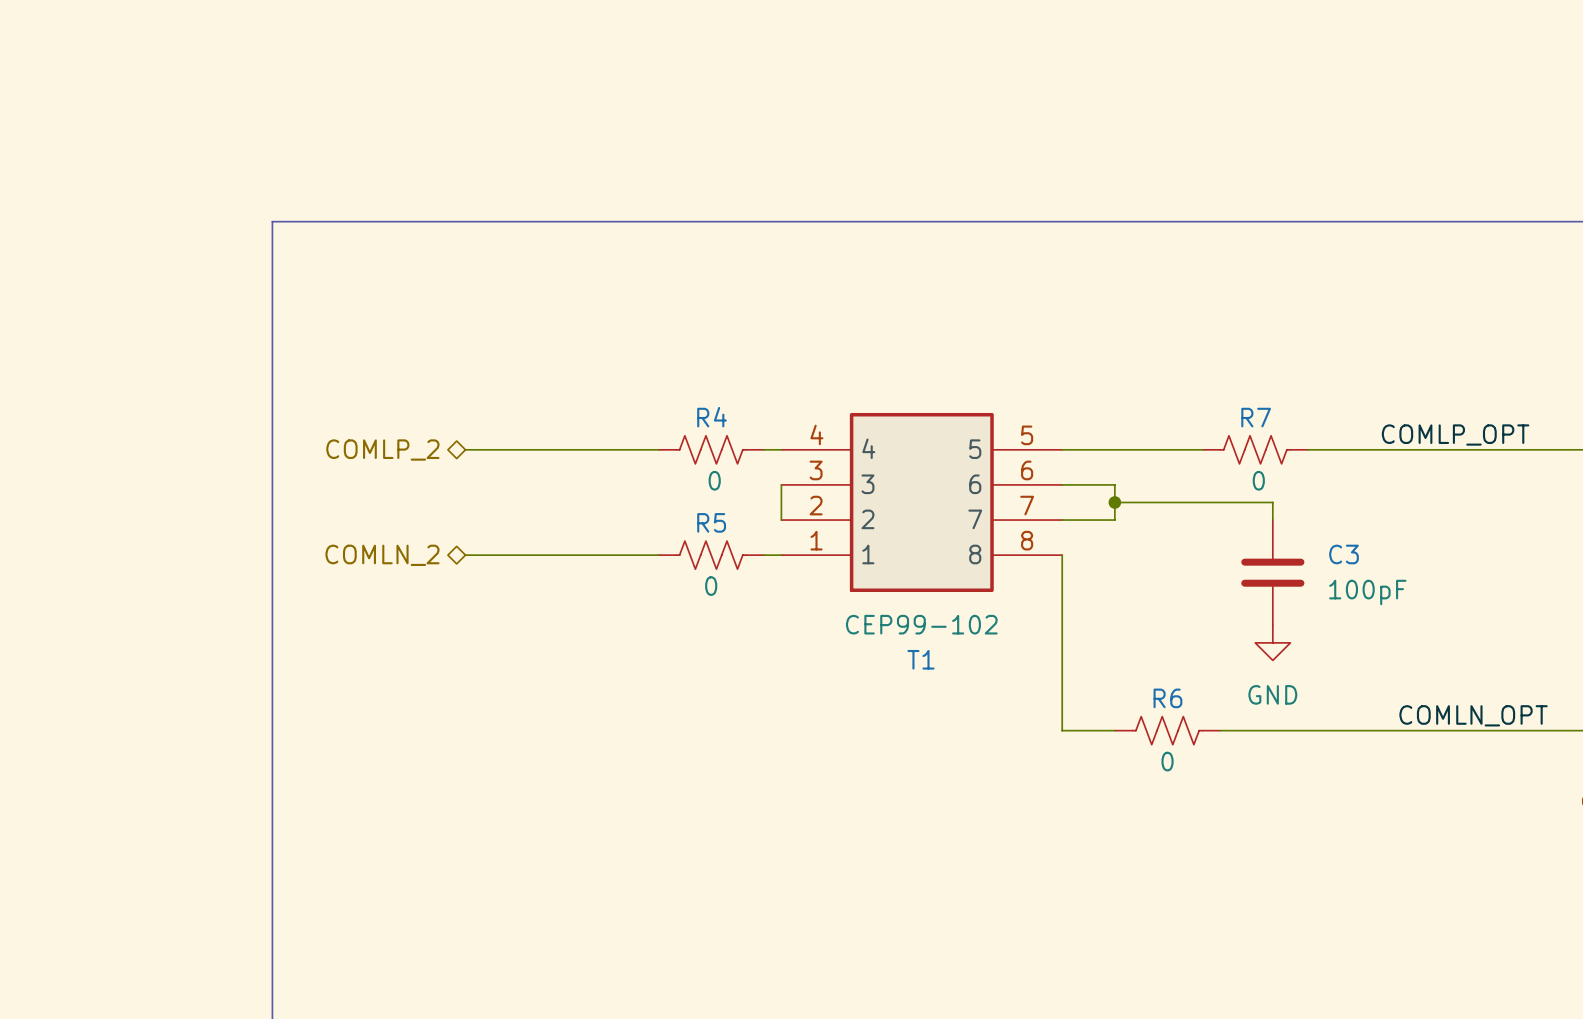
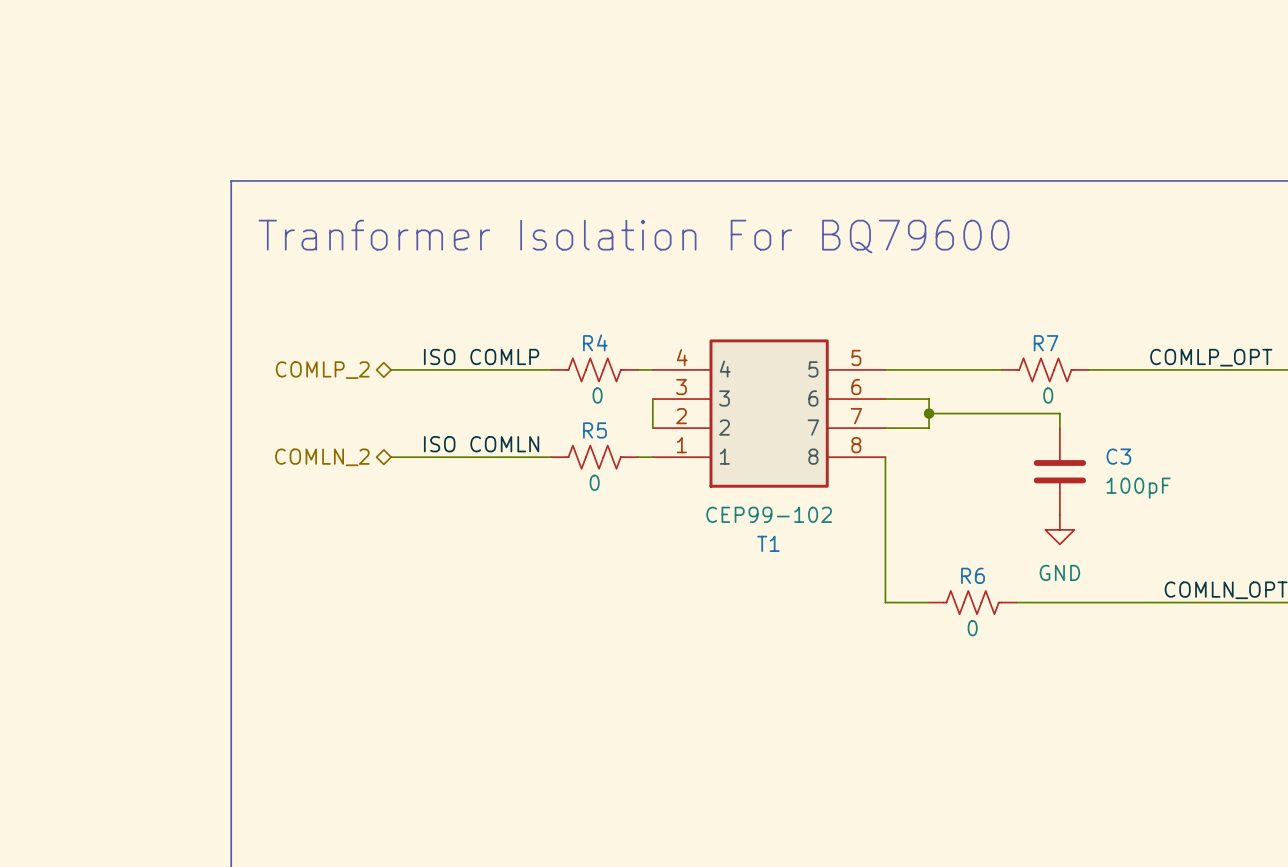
text: none -> Tranformer Isolation For BQ79600 (633, 236)
label: none -> ISO COMLP (481, 356)
label: none -> ISO COMLN (481, 444)

